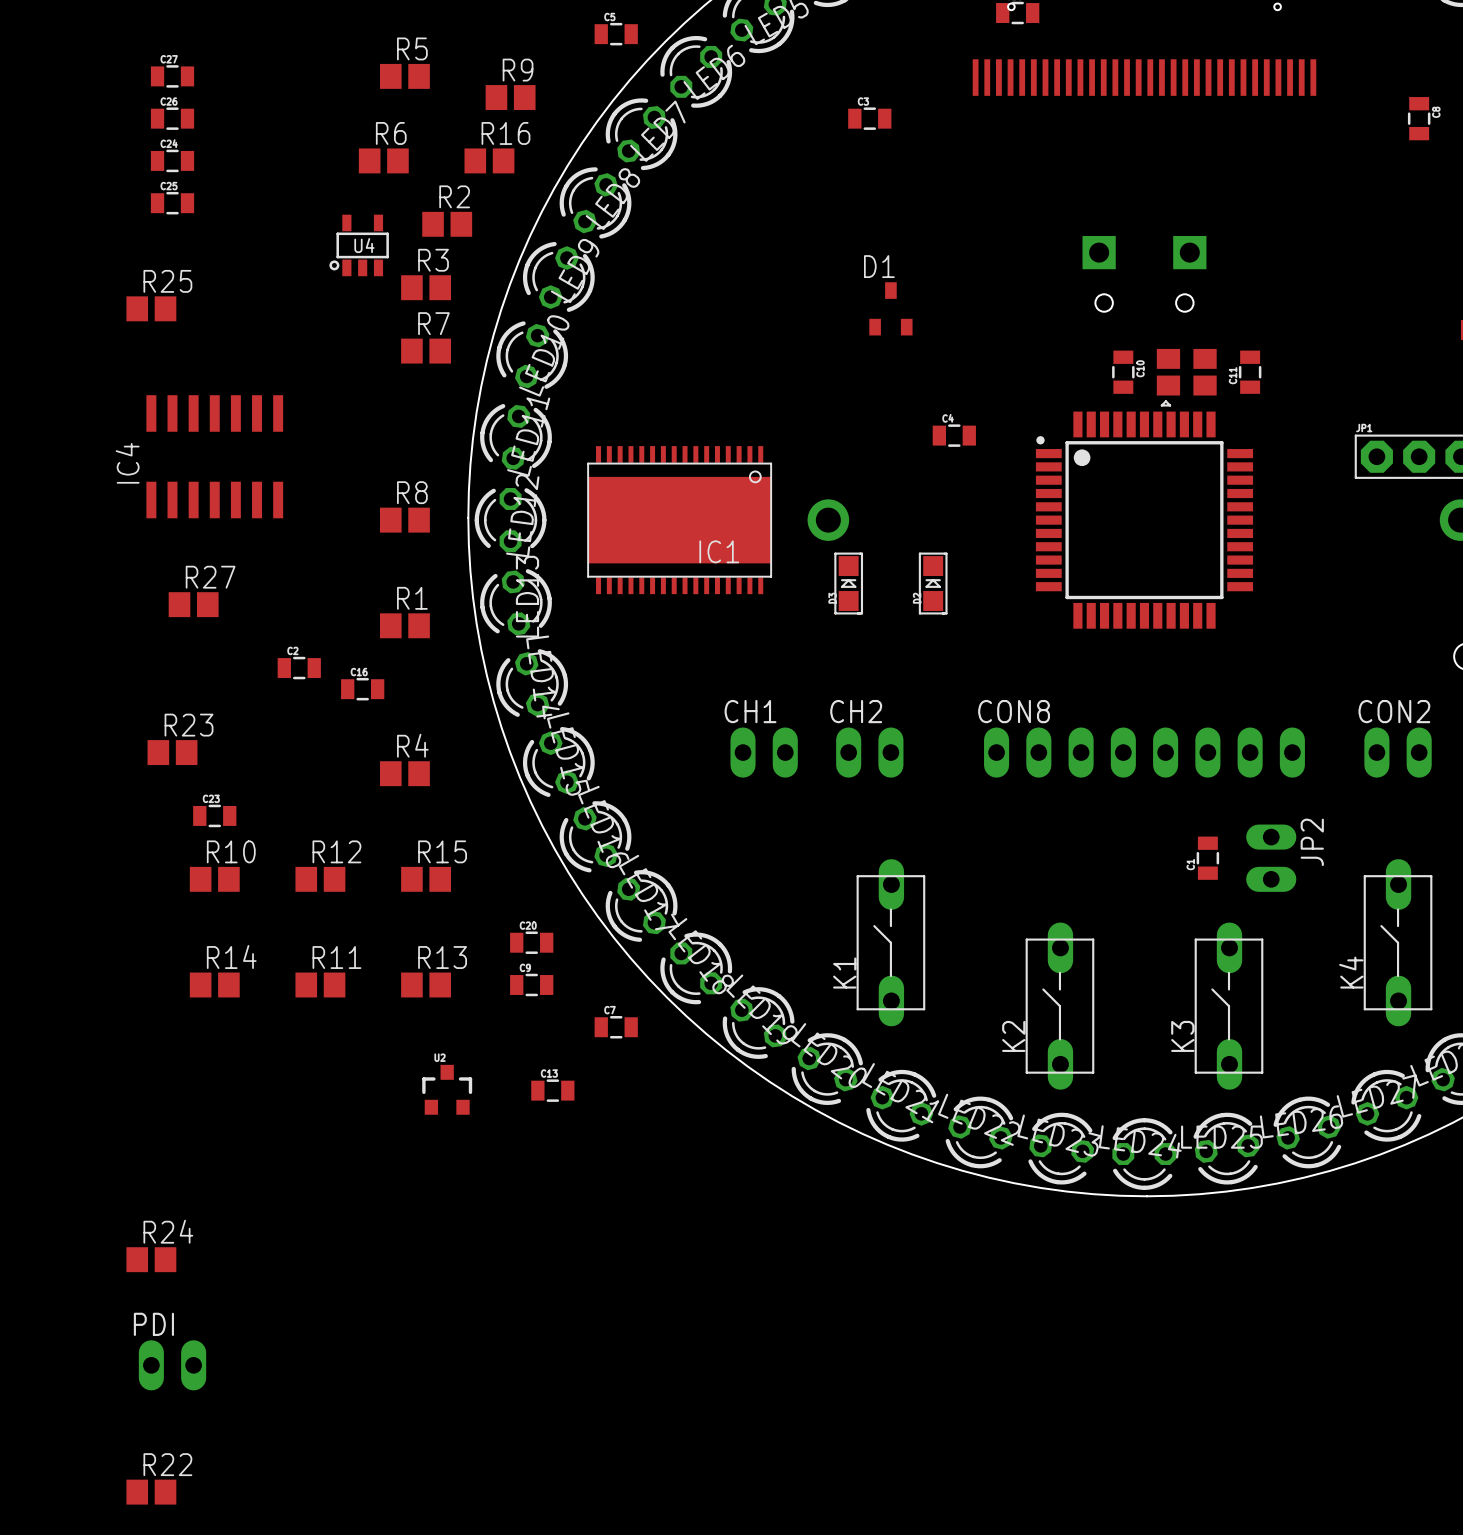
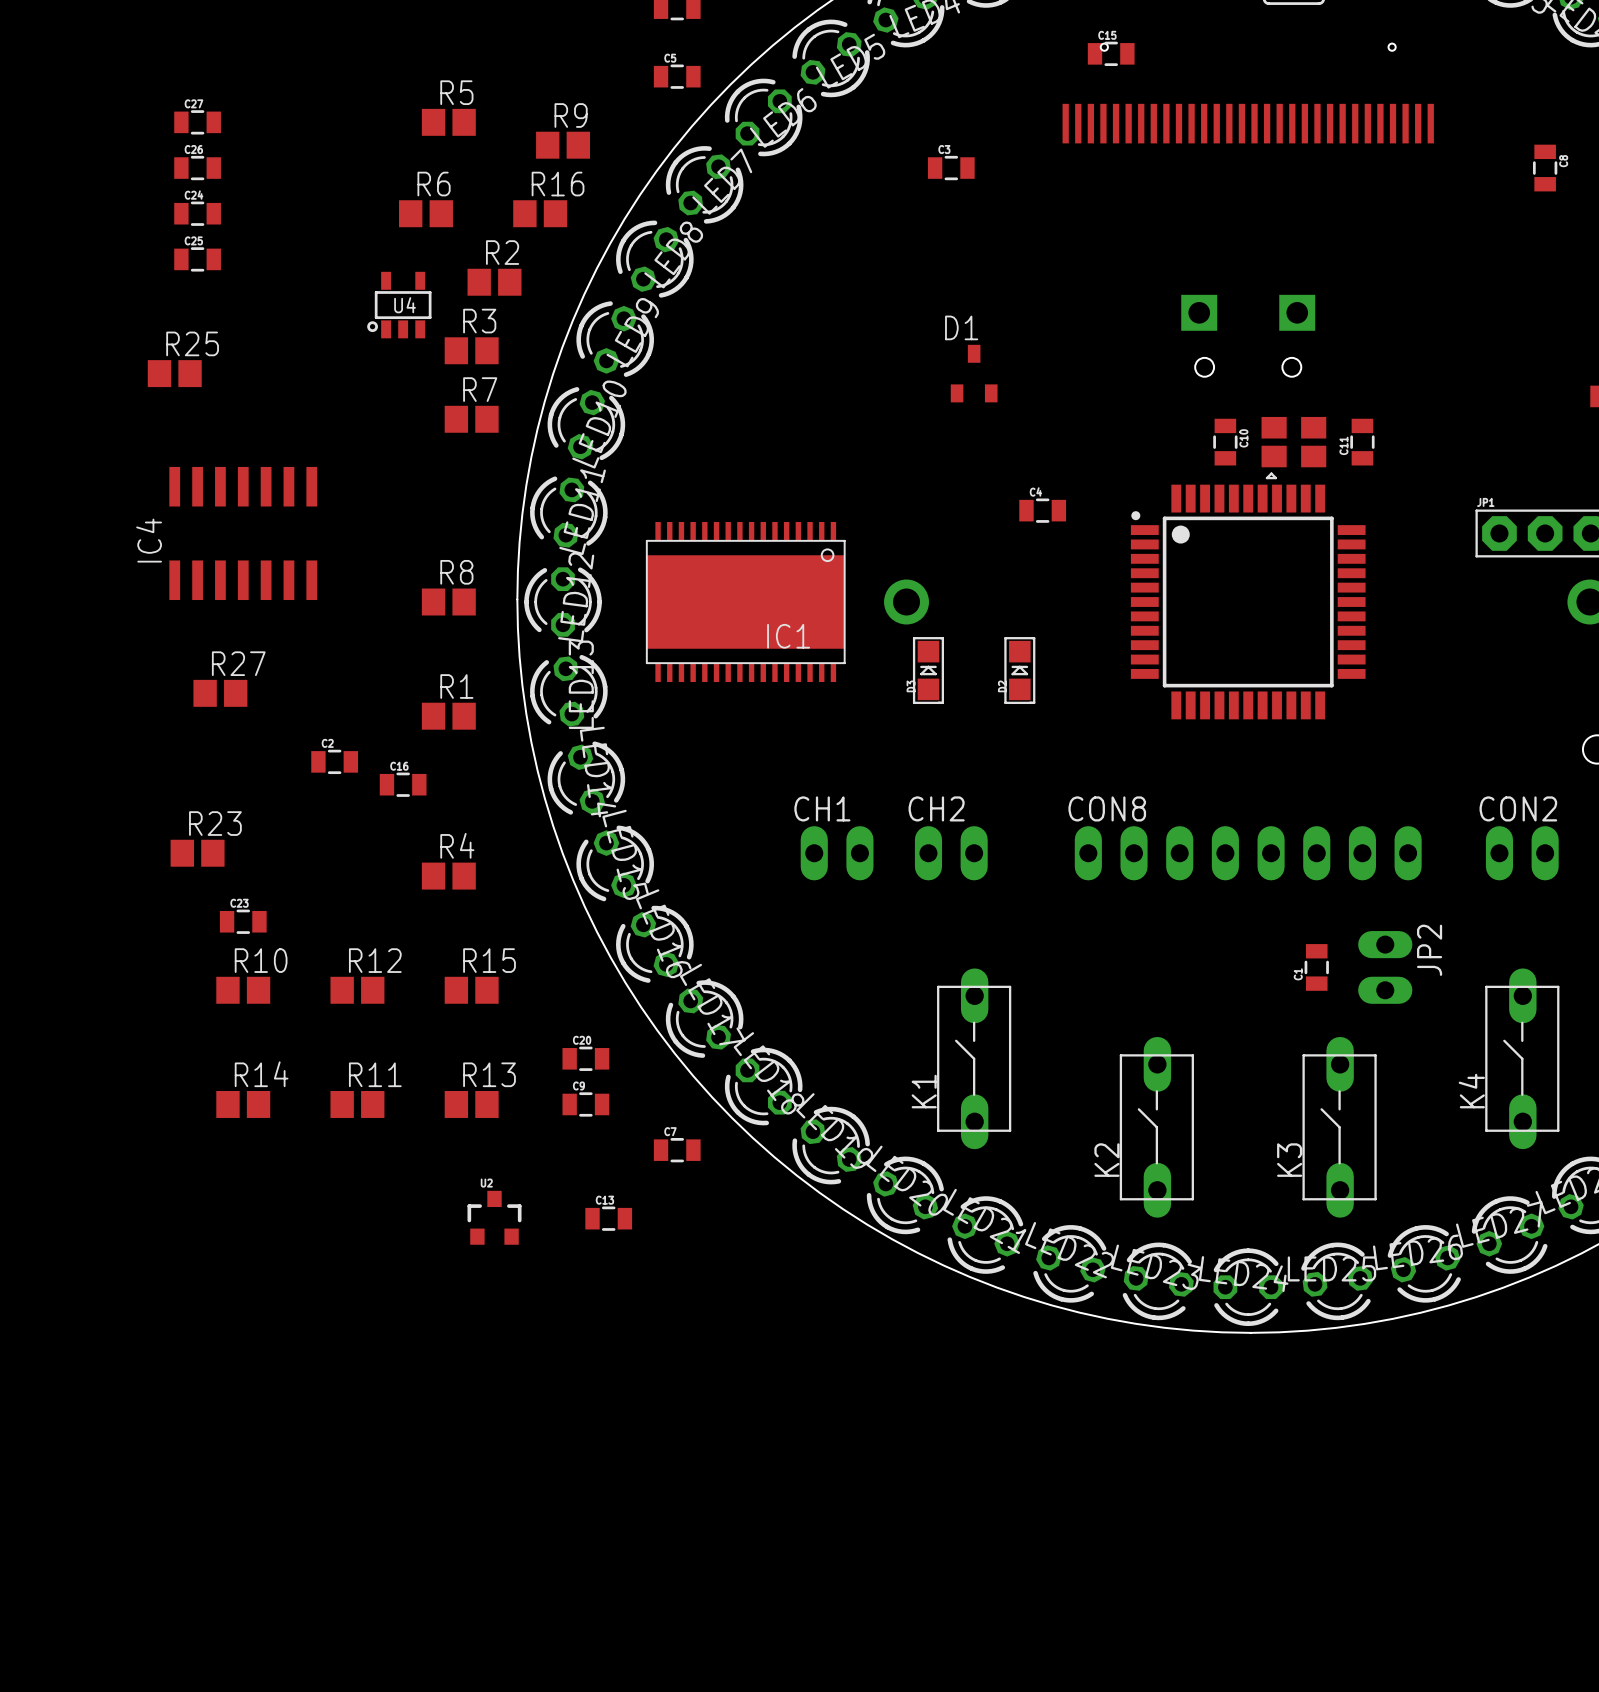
R24: (151, 1259) -> none
PDI: (172, 1365) -> none
R22: (151, 1492) -> none

